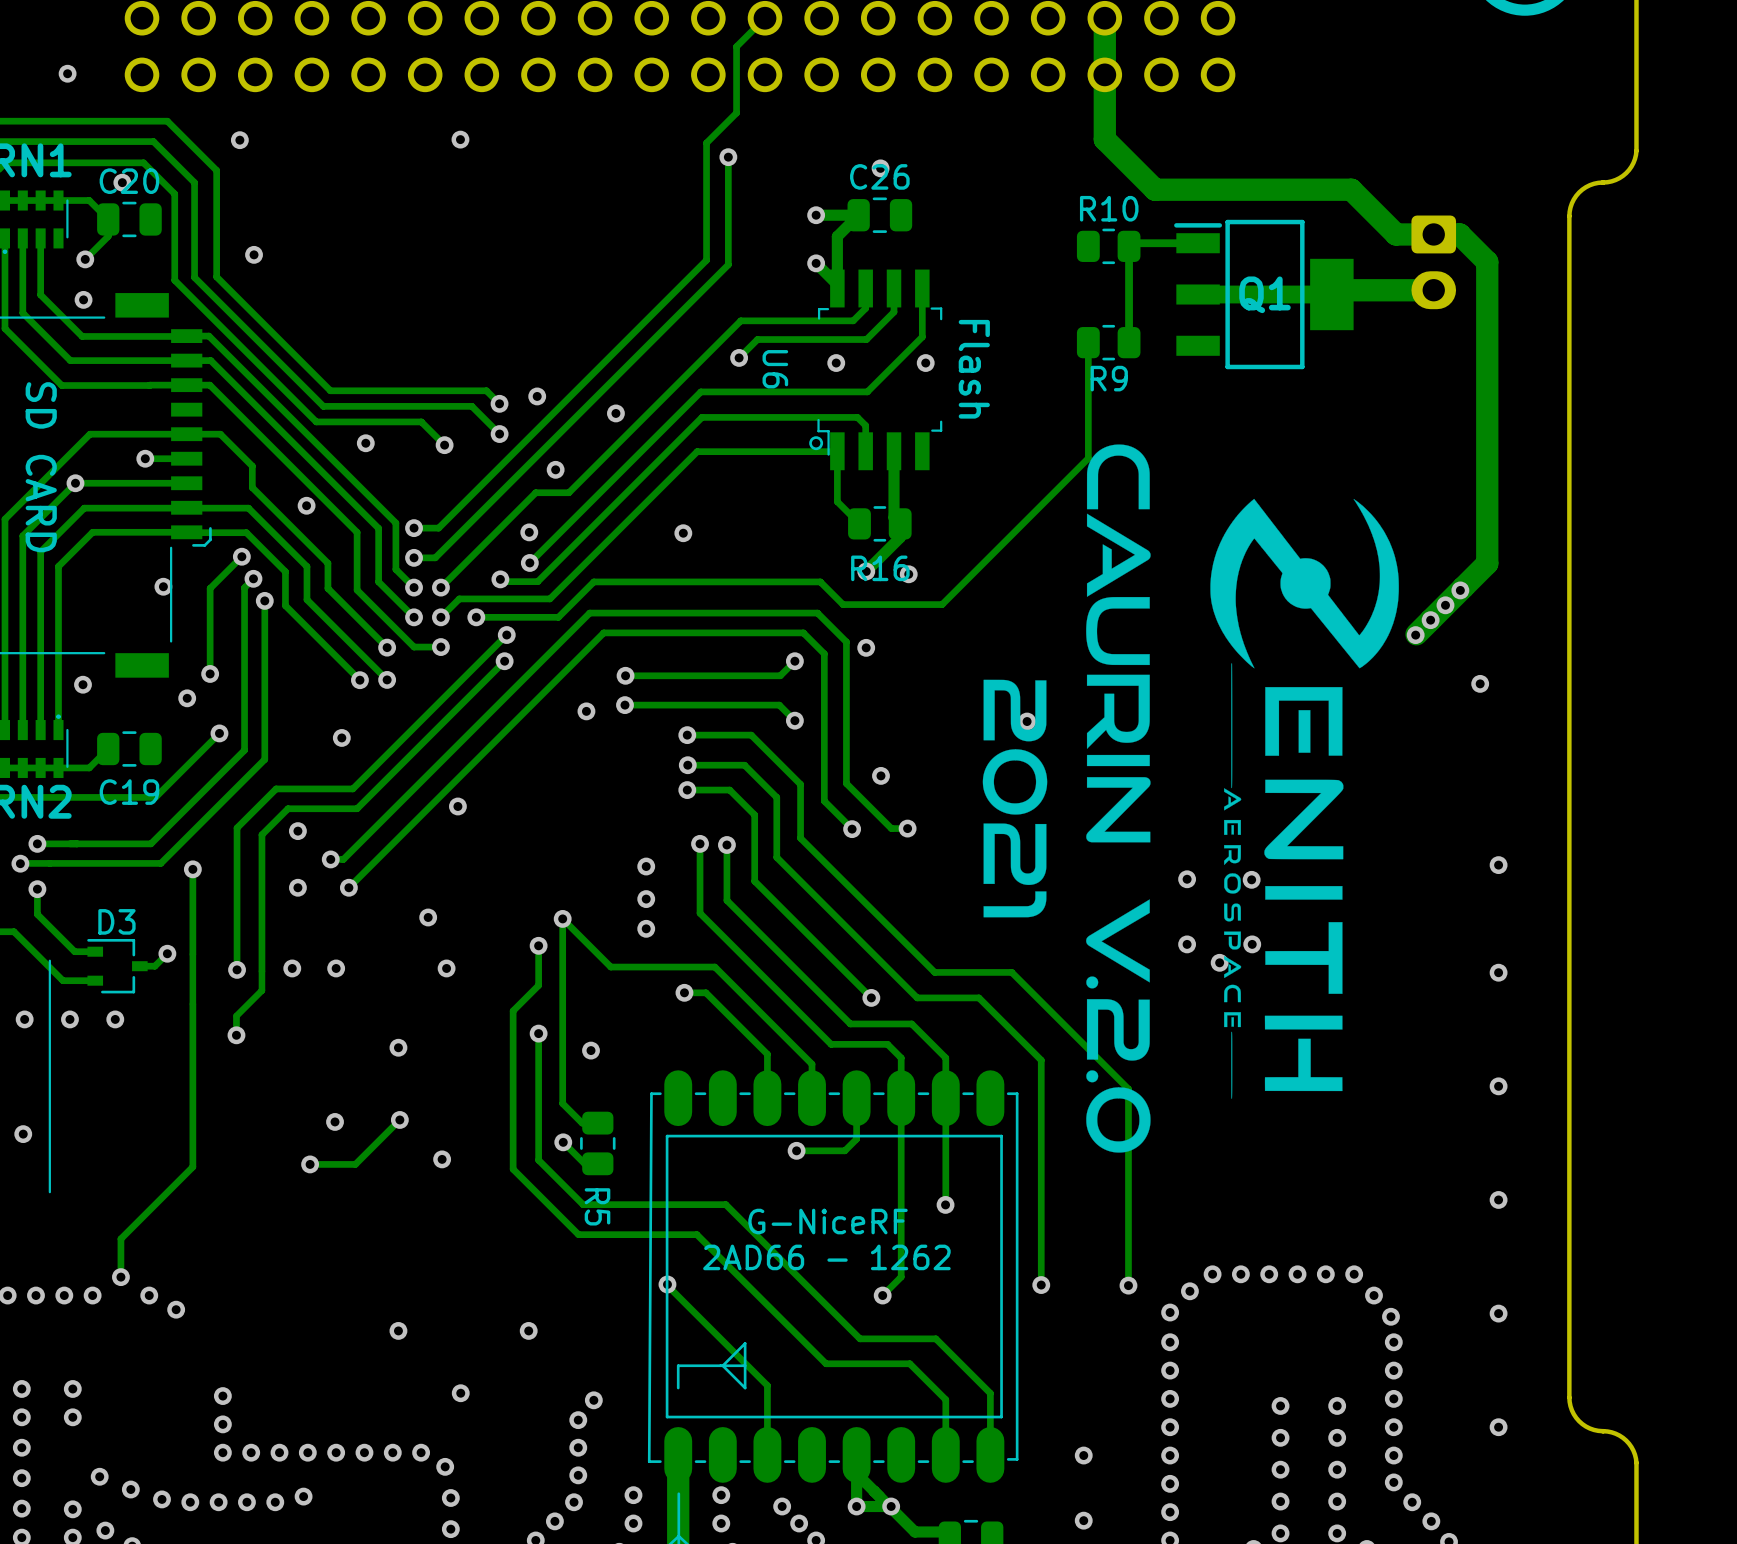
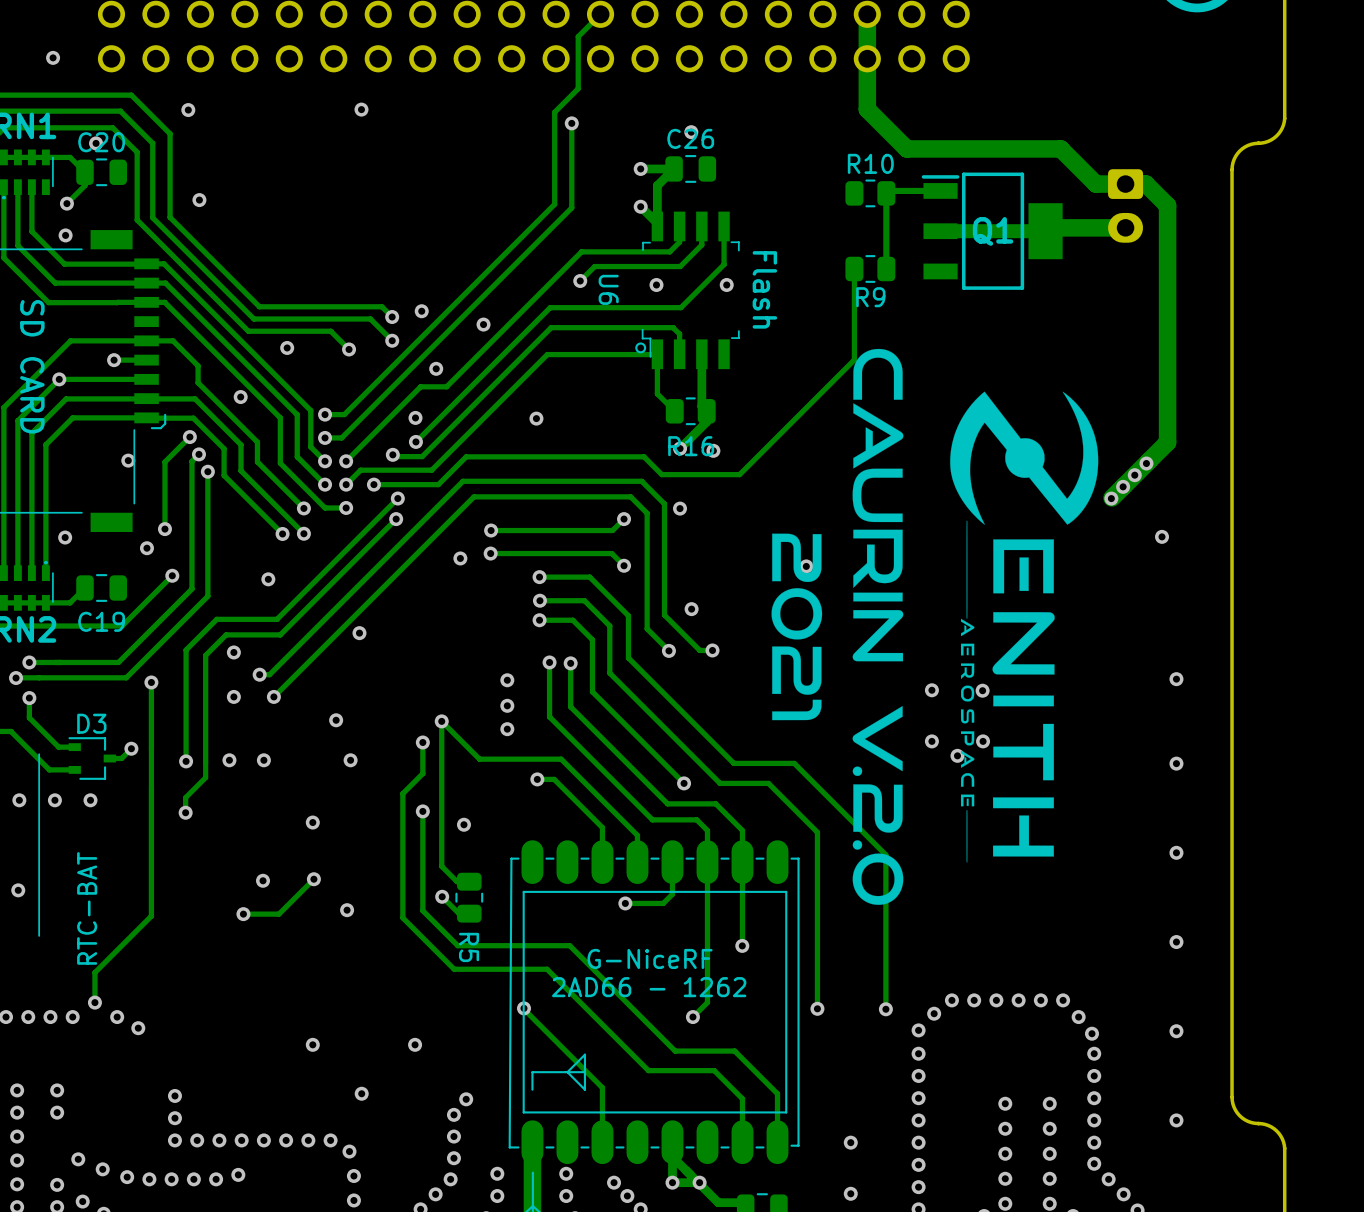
text: none -> RTC-BAT (87, 908)

